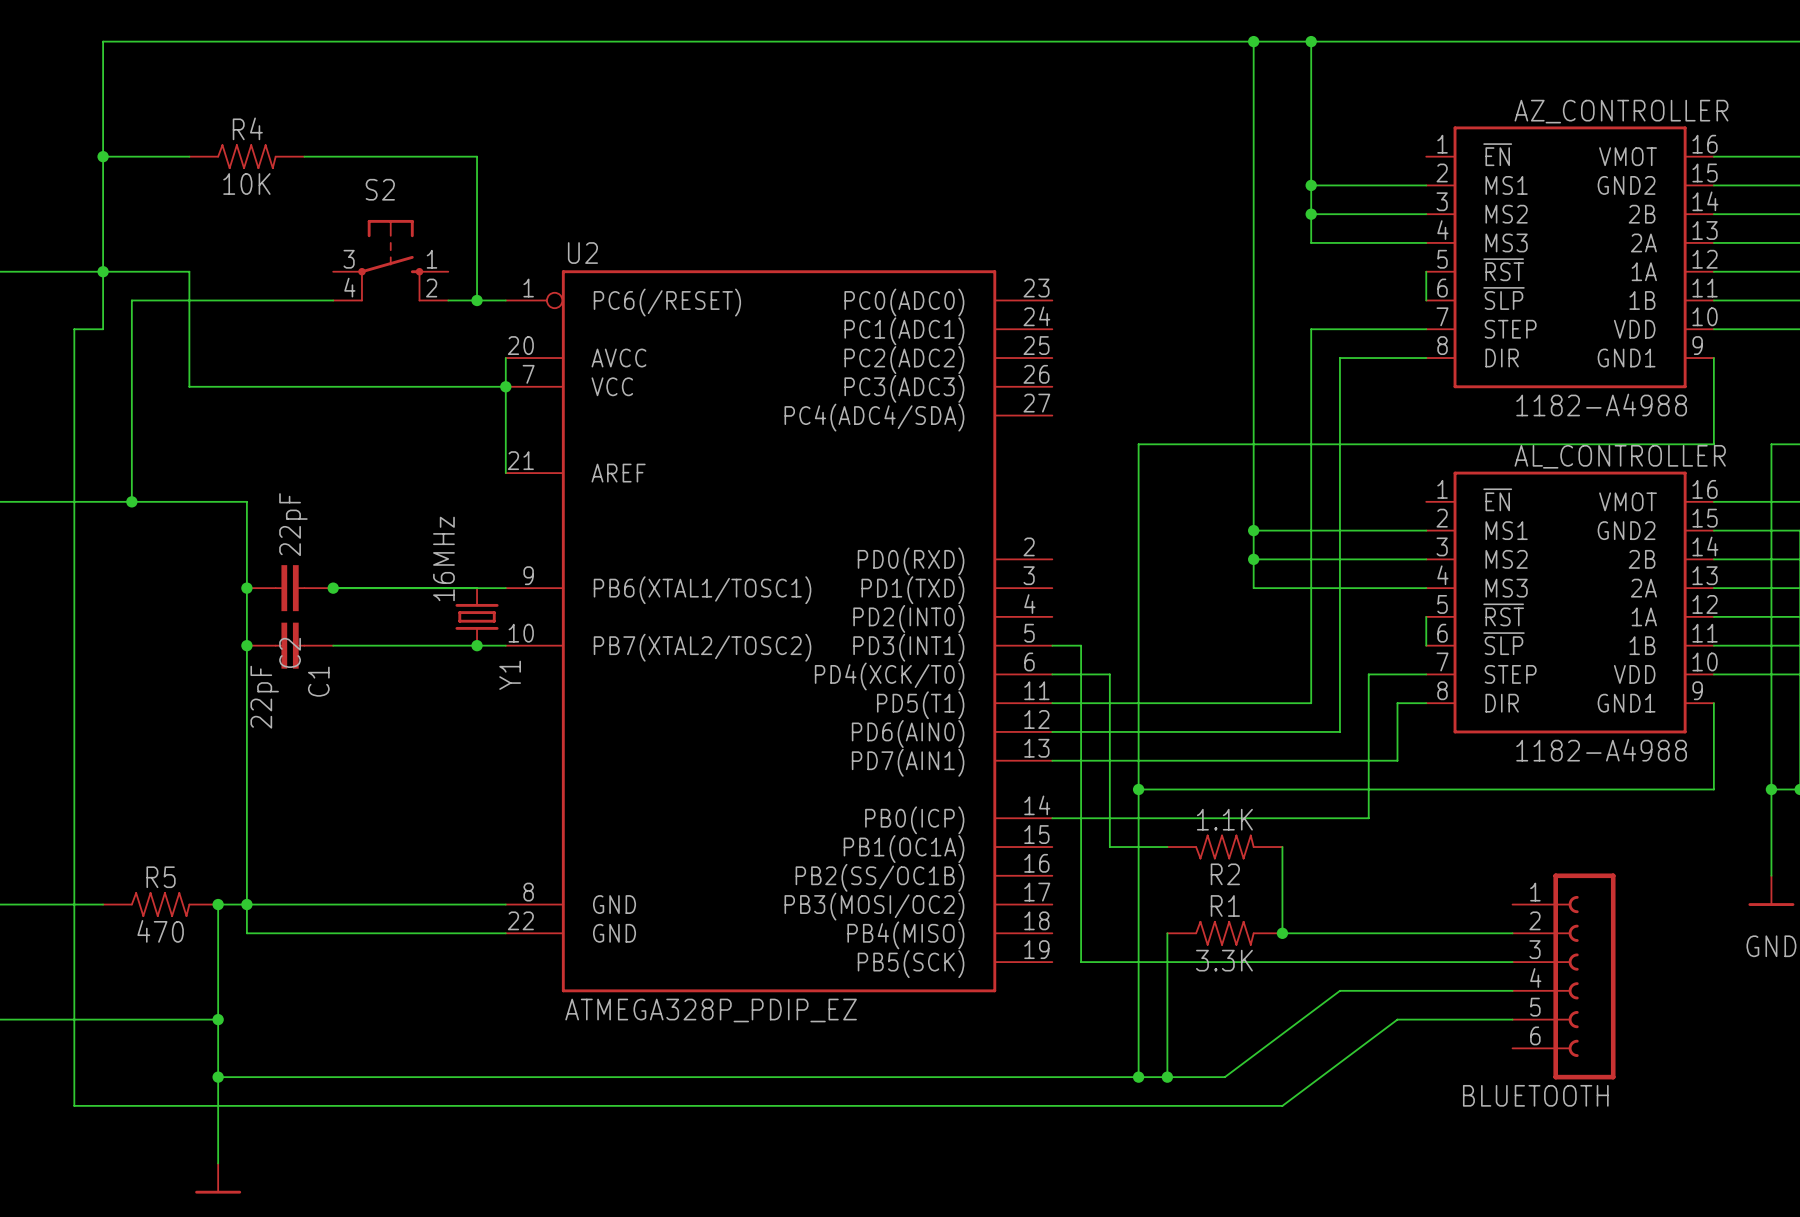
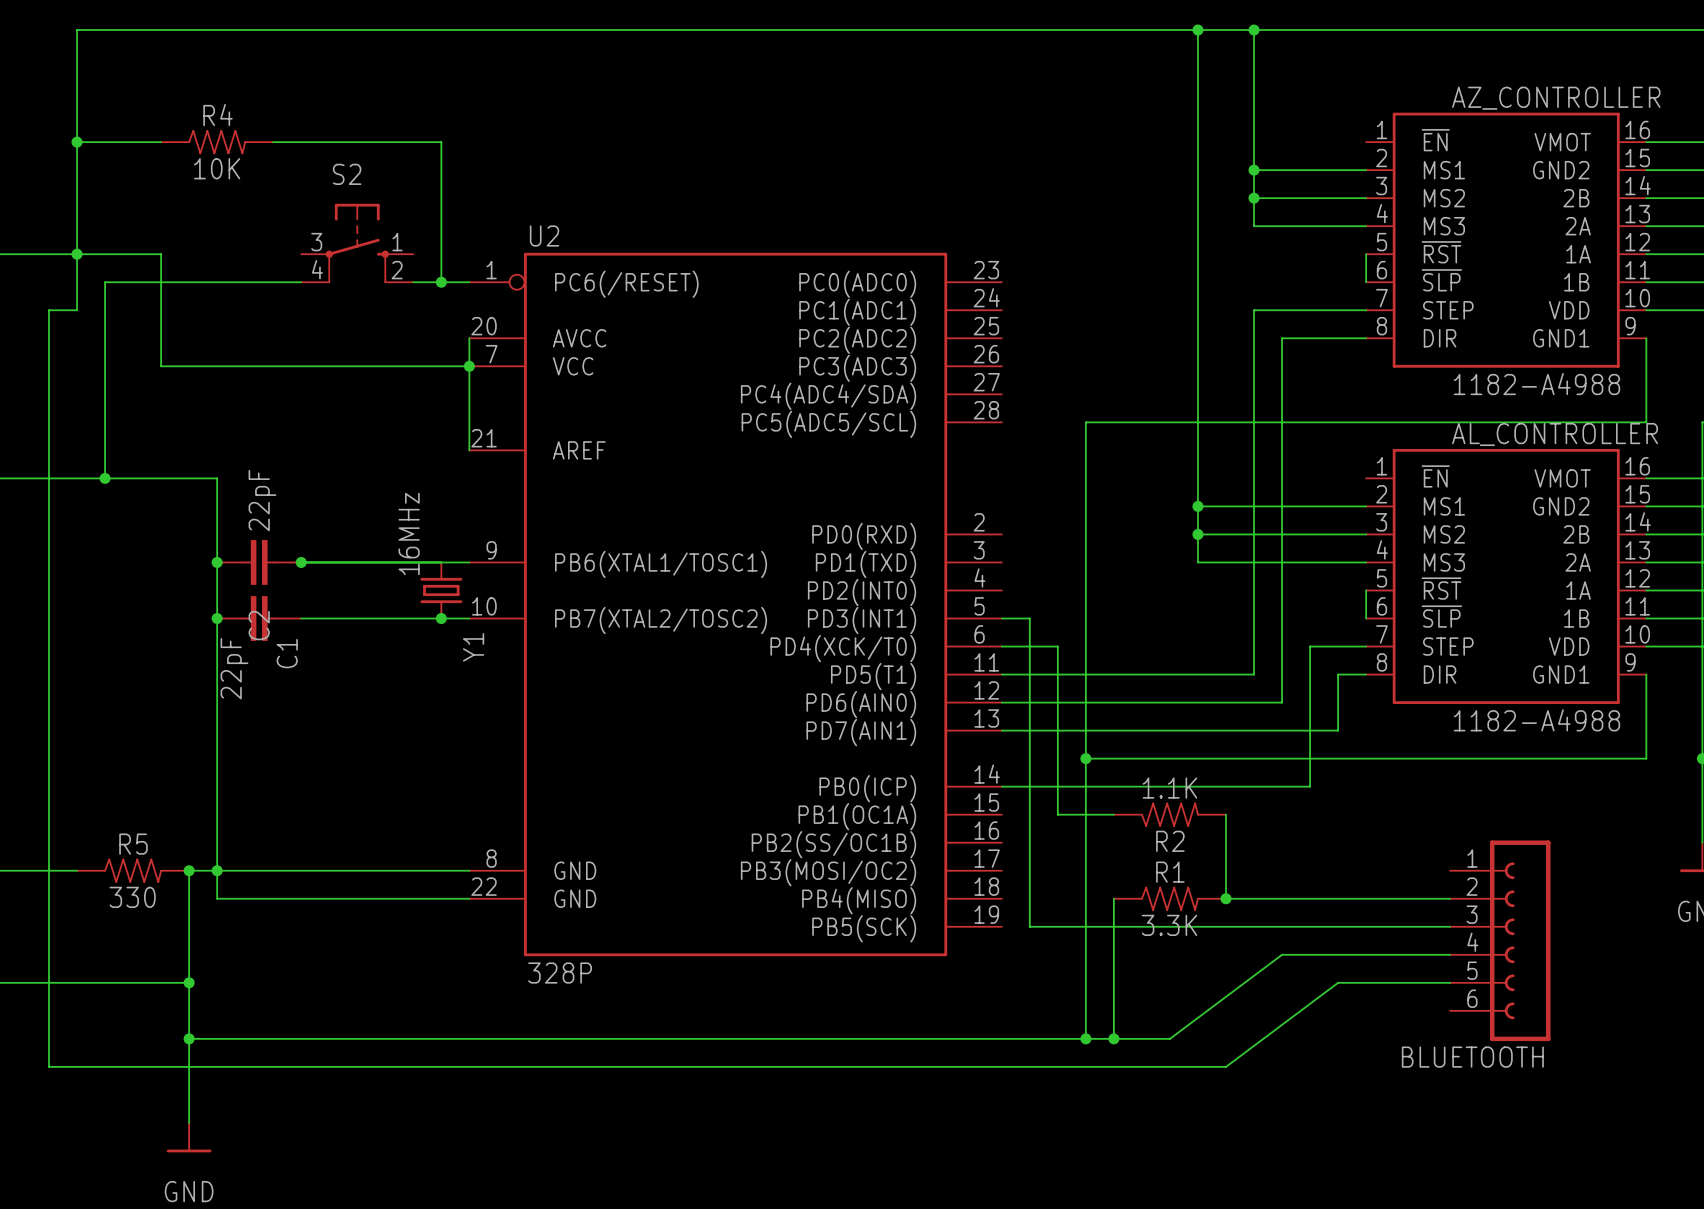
U2 symbol: [505, 270, 1053, 993] -> [469, 252, 1002, 957]
R5 value: 470 (160, 931) -> 330 (132, 897)
U2 value: ATMEGA328P_PDIP_EZ (711, 1010) -> 328P (560, 973)

